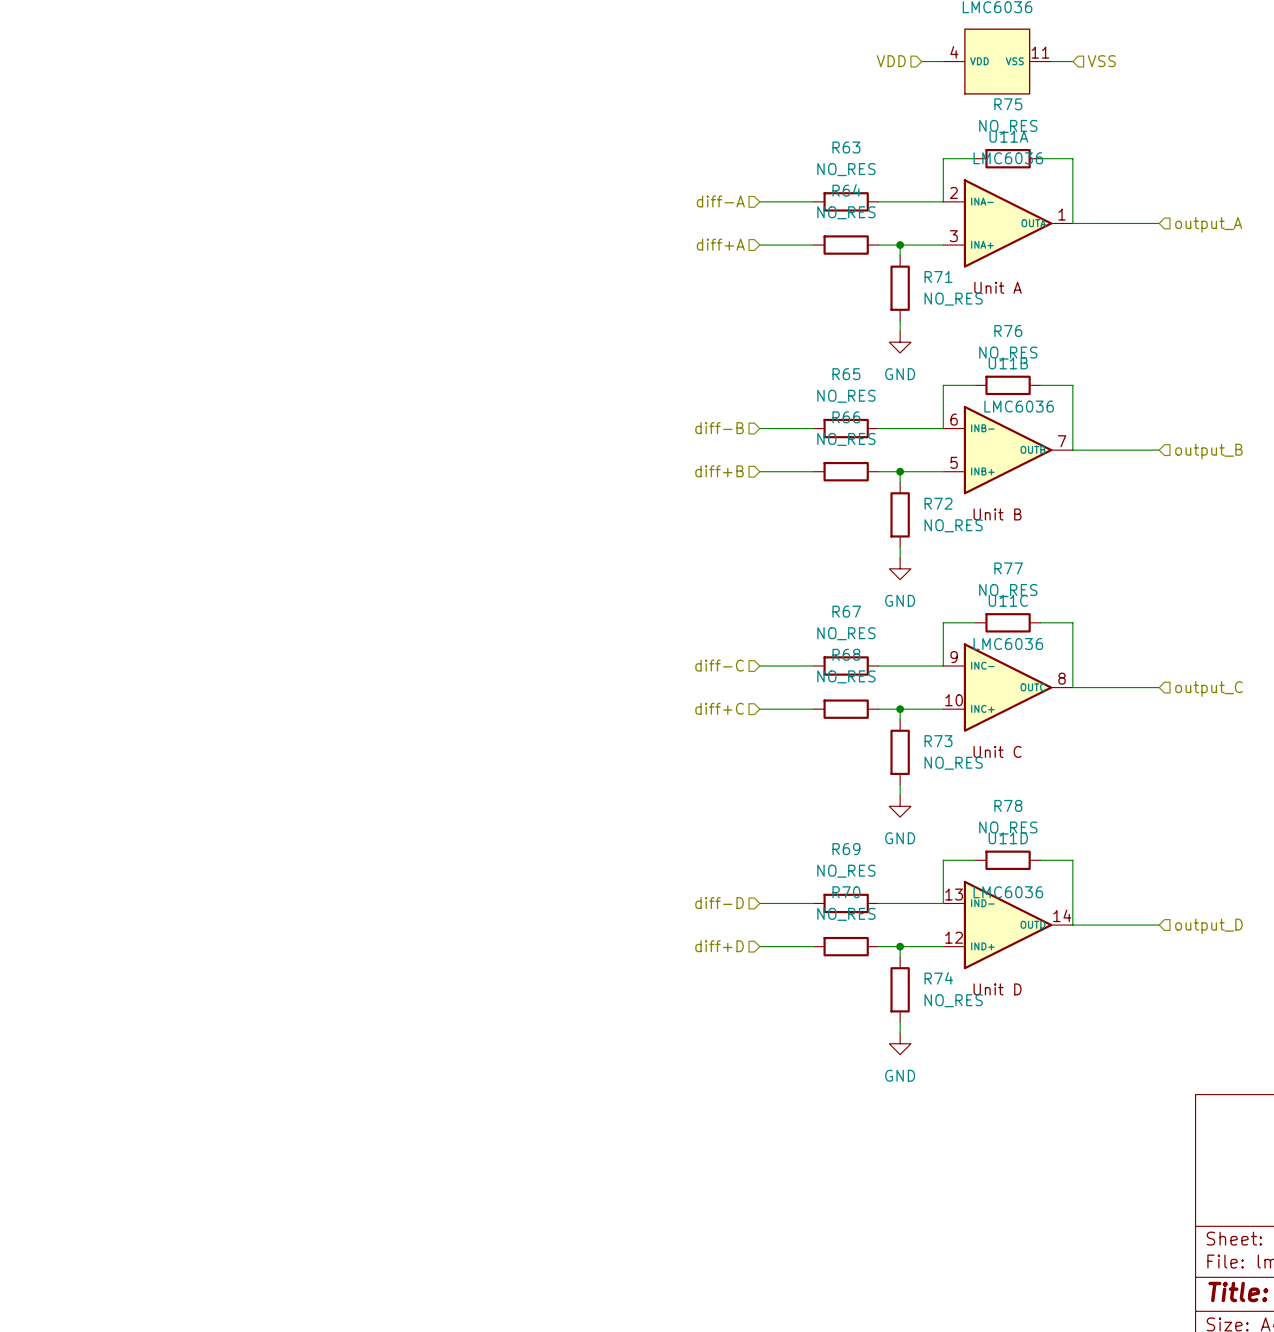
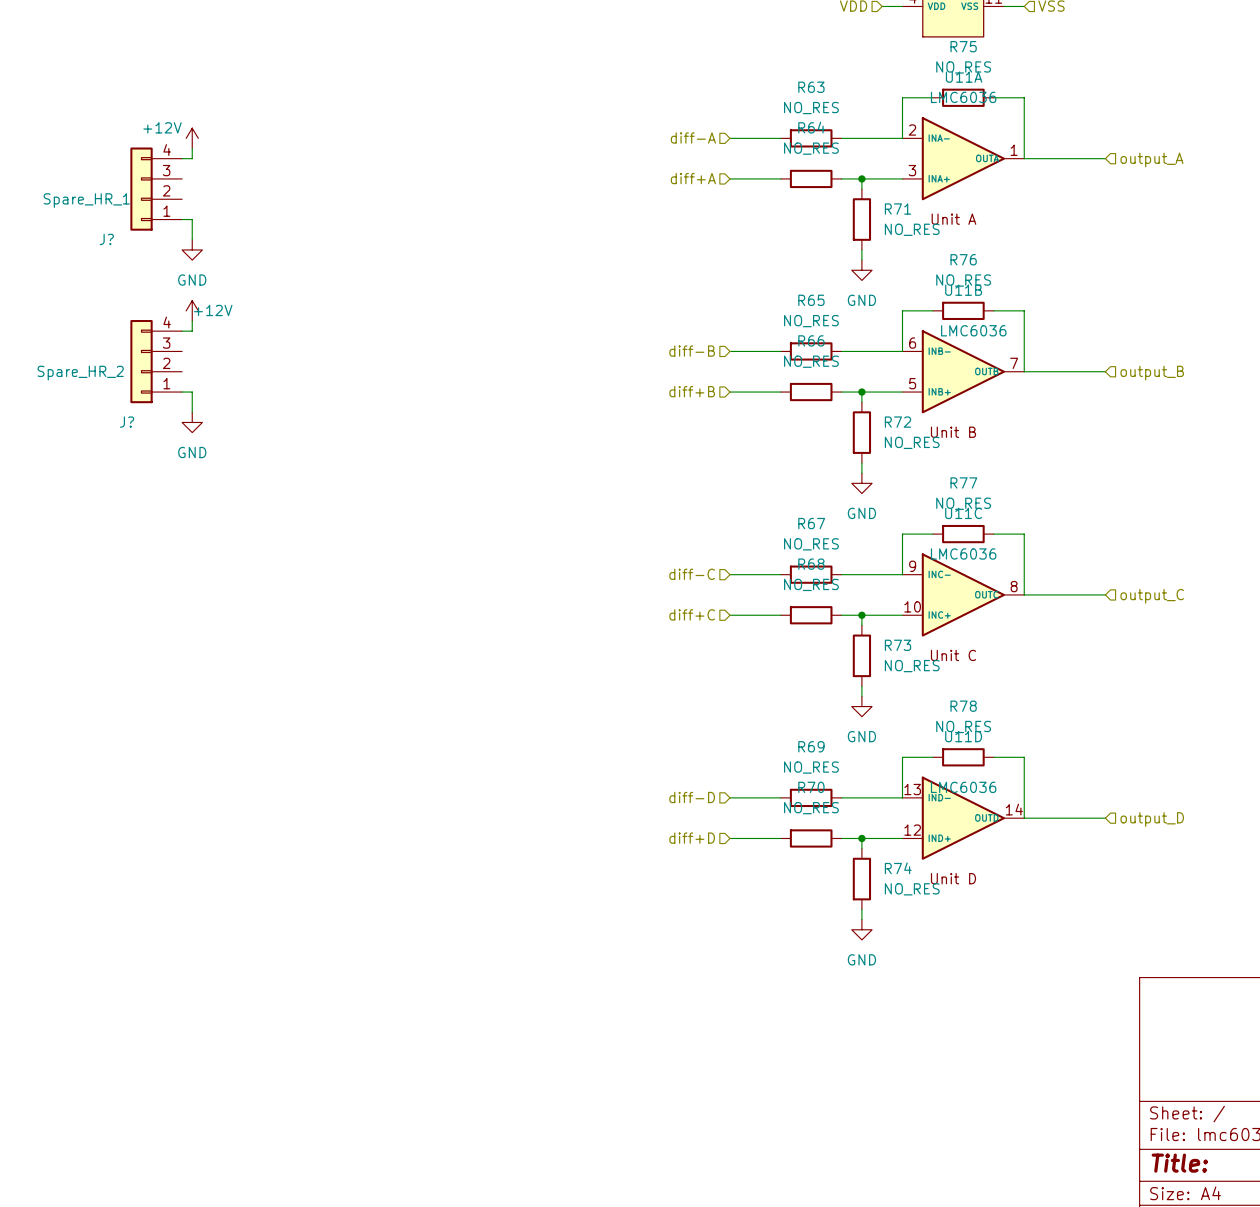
power symbol: none -> +12V (192, 138)
wire: none -> (192, 148) (192, 158) (182, 158)
J?: none -> Spare_HR_1 (156, 189)
wire: none -> (182, 219) (192, 219) (192, 239)
power symbol: none -> GND (192, 249)
power symbol: none -> +12V (192, 310)
wire: none -> (192, 321) (192, 331) (182, 331)
J?: none -> Spare_HR_2 (156, 361)
wire: none -> (182, 392) (192, 392) (192, 412)
power symbol: none -> GND (192, 422)

